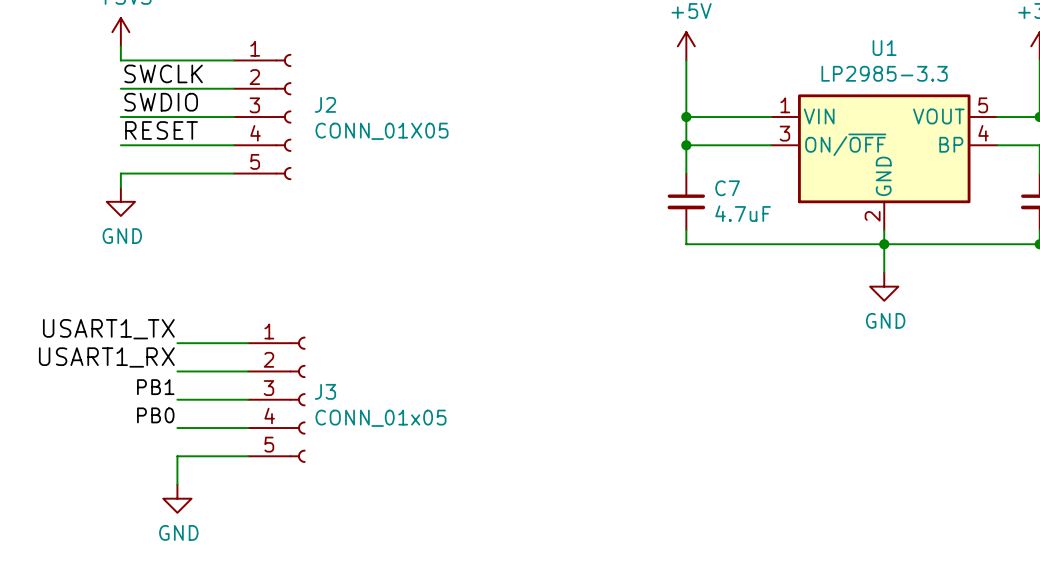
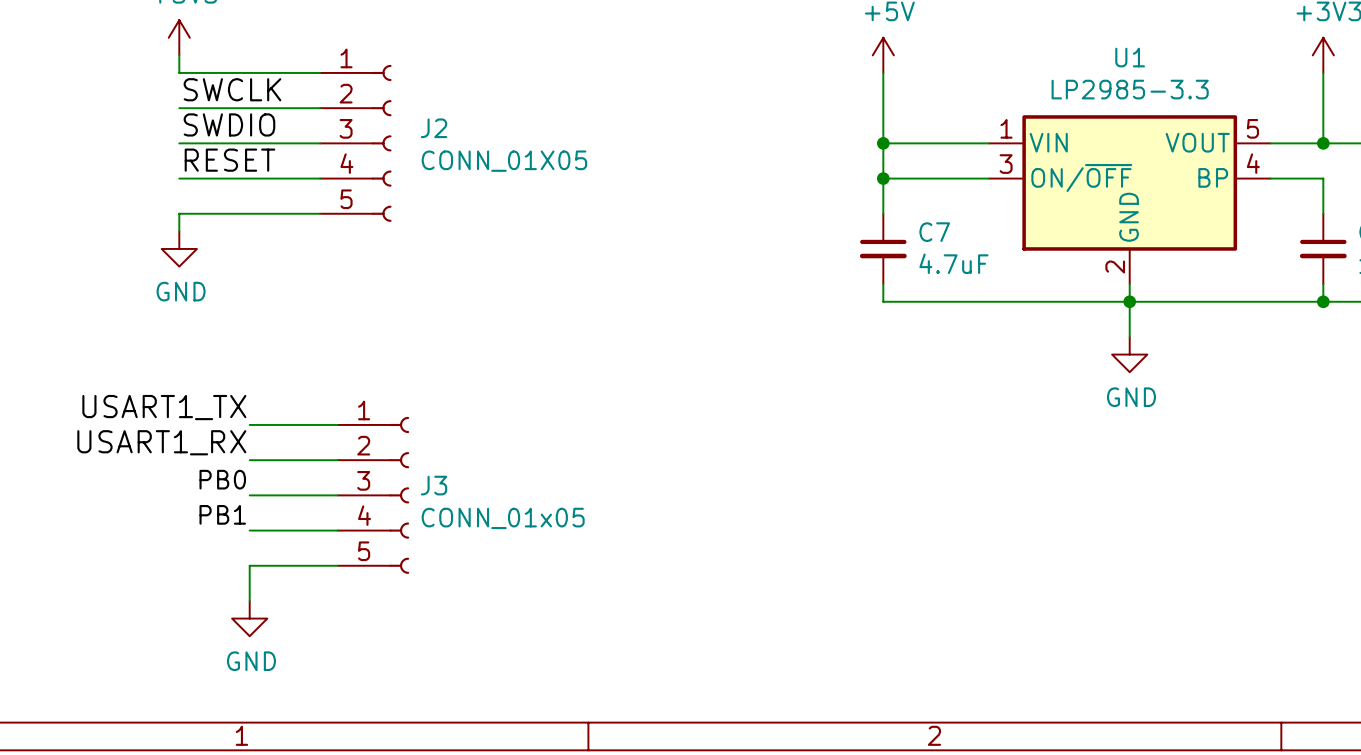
label: PB1 (155, 387) -> PB0 (222, 479)
label: PB0 (155, 415) -> PB1 (222, 514)

